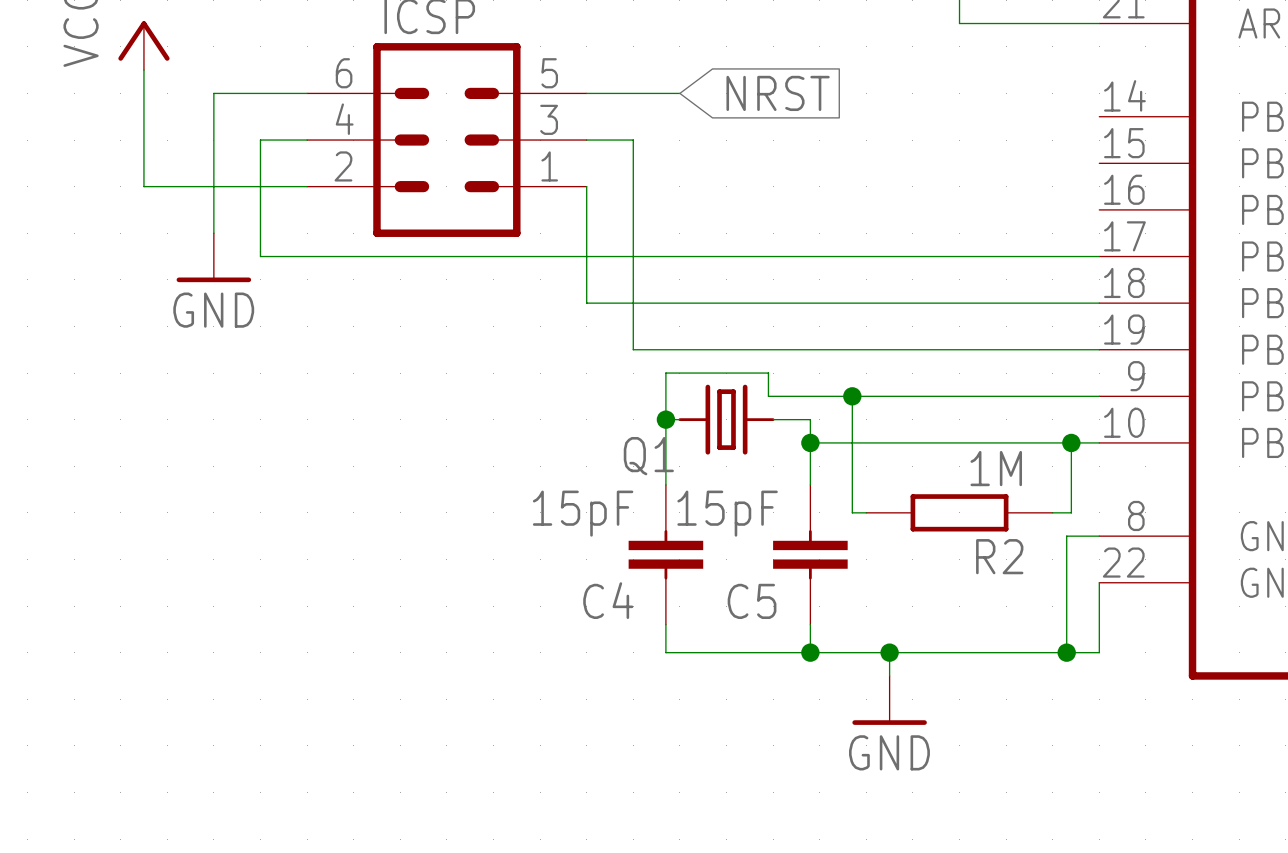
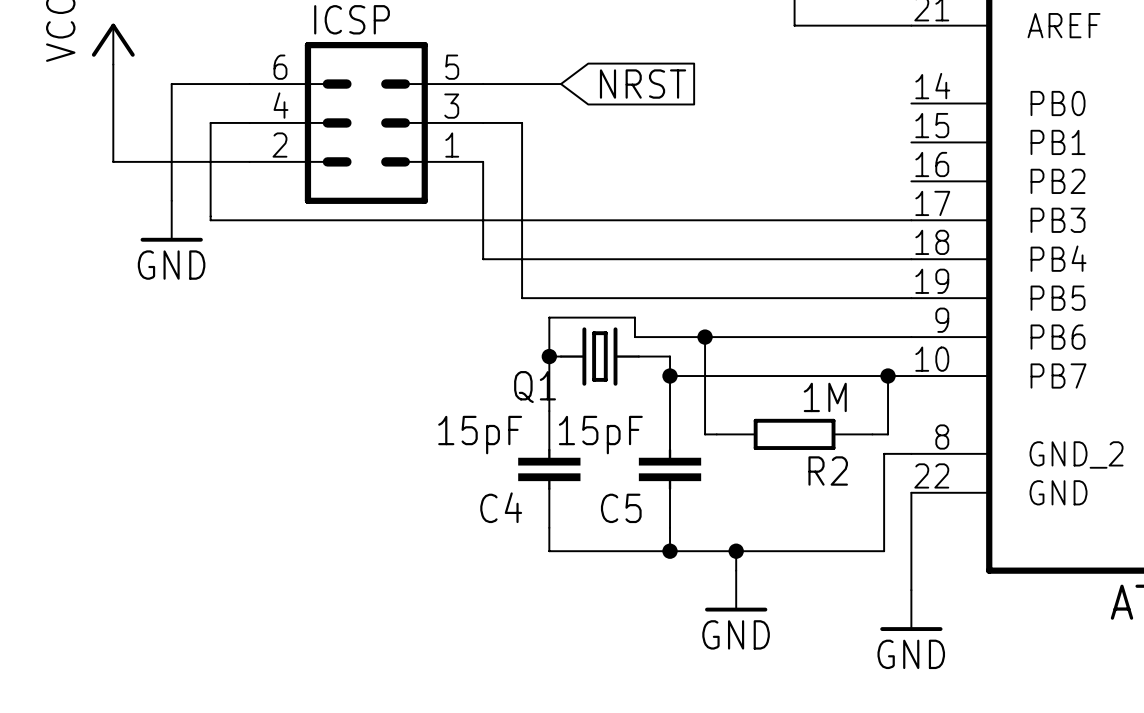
wire: (1066, 652) (1099, 652) -> (911, 590) (911, 551)
junction: (1066, 652) -> none
power symbol: none -> GND (911, 610)

